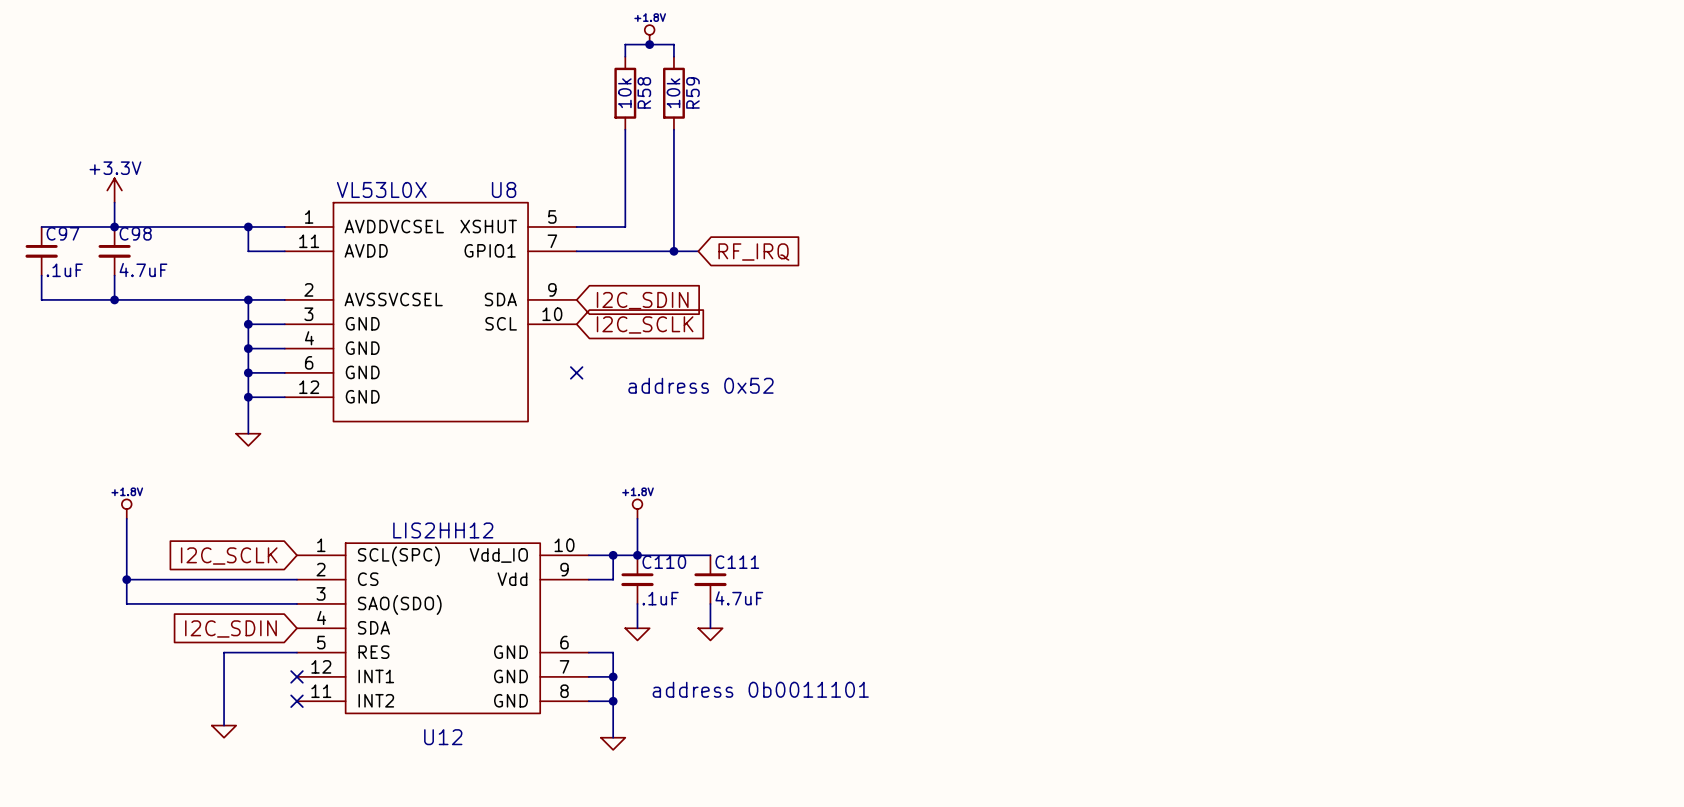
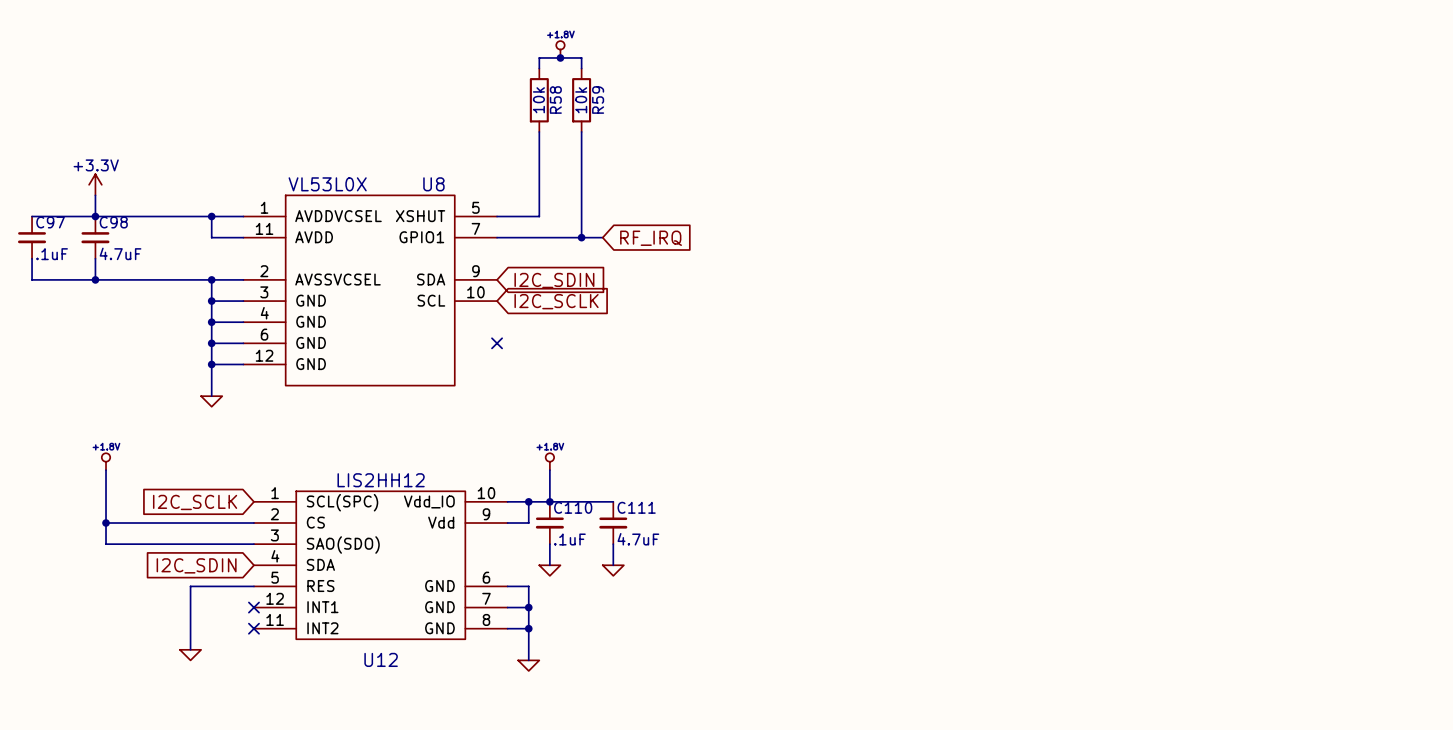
text: address 0x52 (700, 385) -> none
text: address 0b0011101 (760, 689) -> none

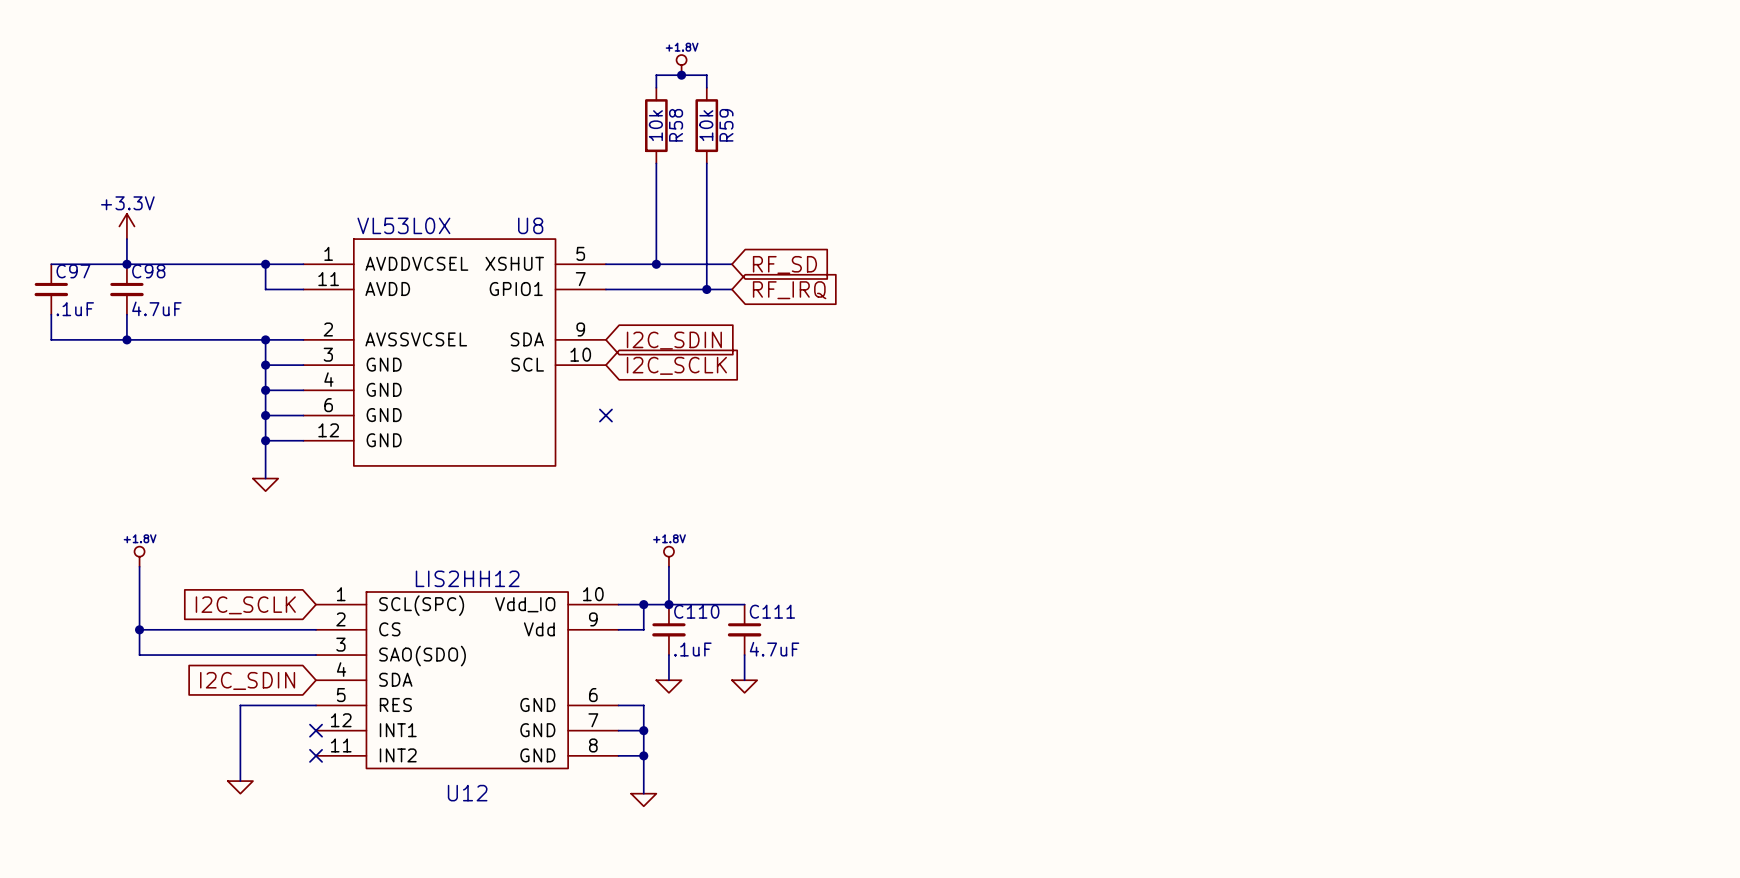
wire: none -> (656, 264) (731, 264)
junction: none -> (656, 264)
global label: none -> RF_SD (784, 264)

